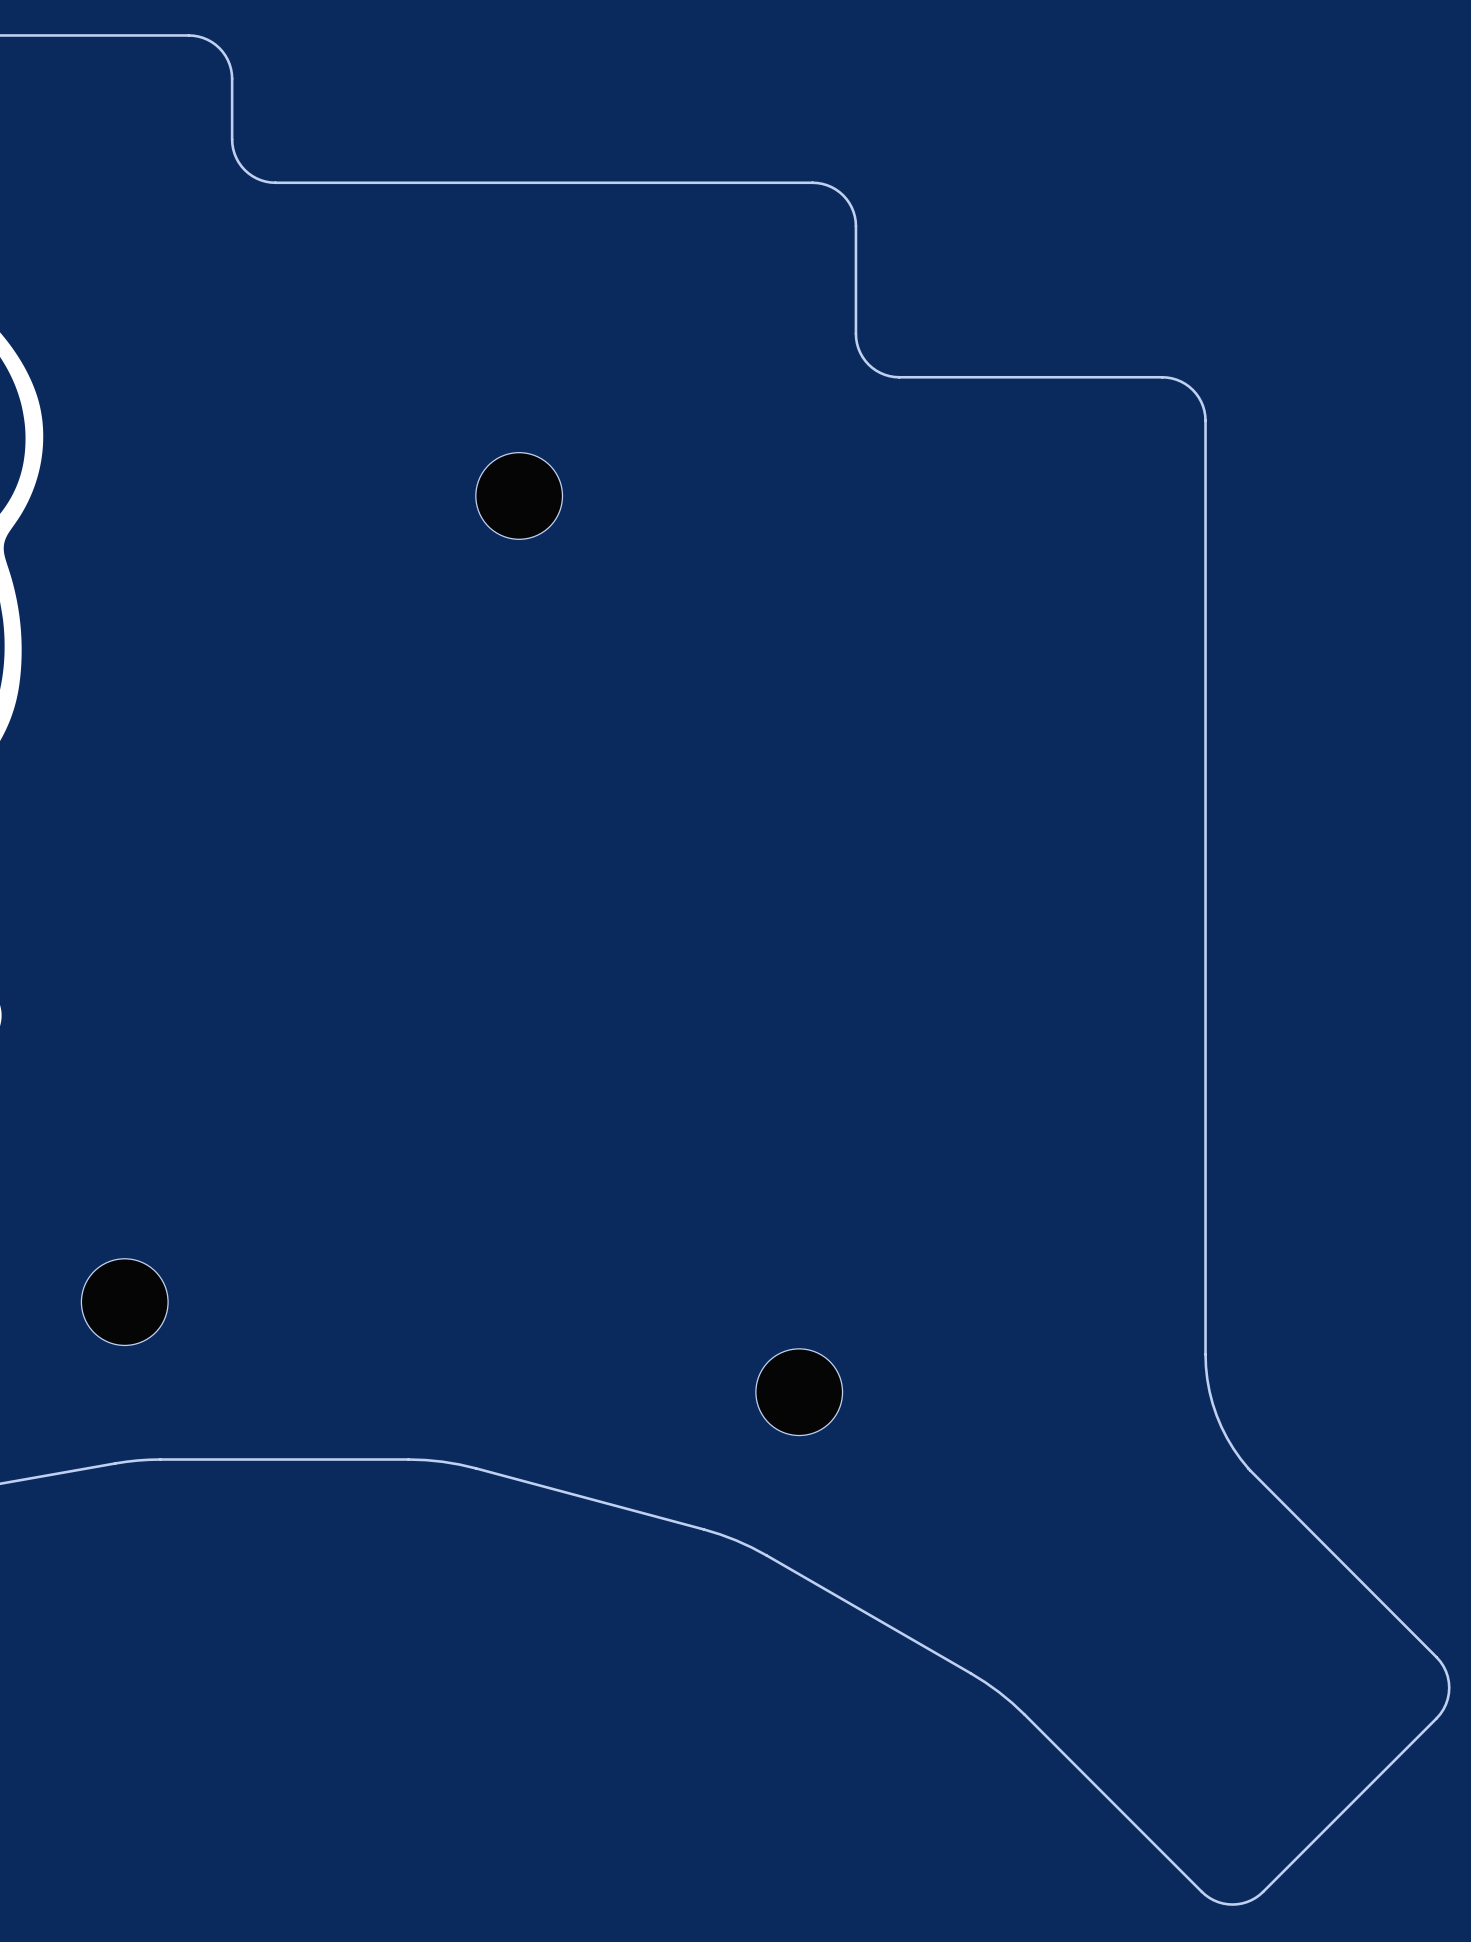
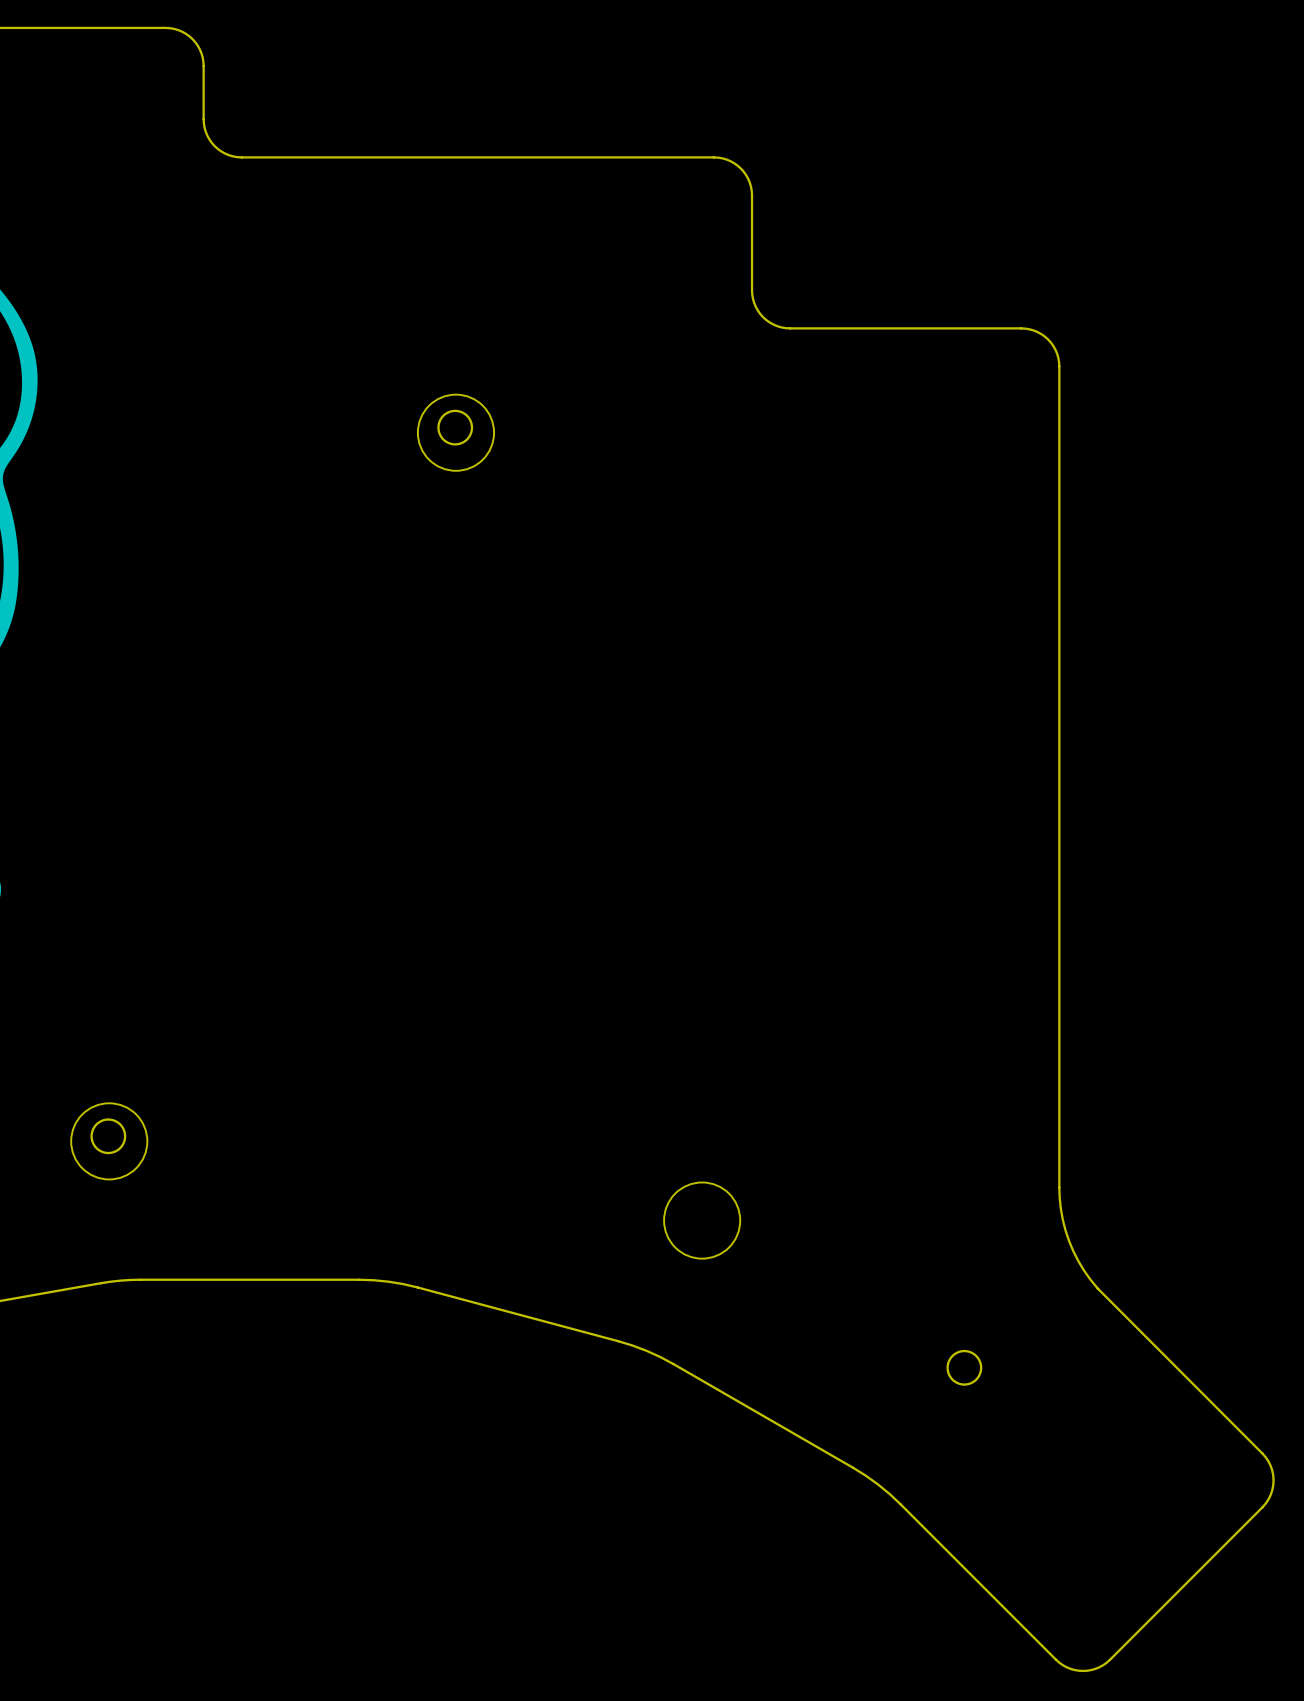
round board edge: none -> [437, 409, 474, 446]
round board edge: none -> [90, 1118, 127, 1155]
round board edge: none -> [946, 1349, 983, 1386]

